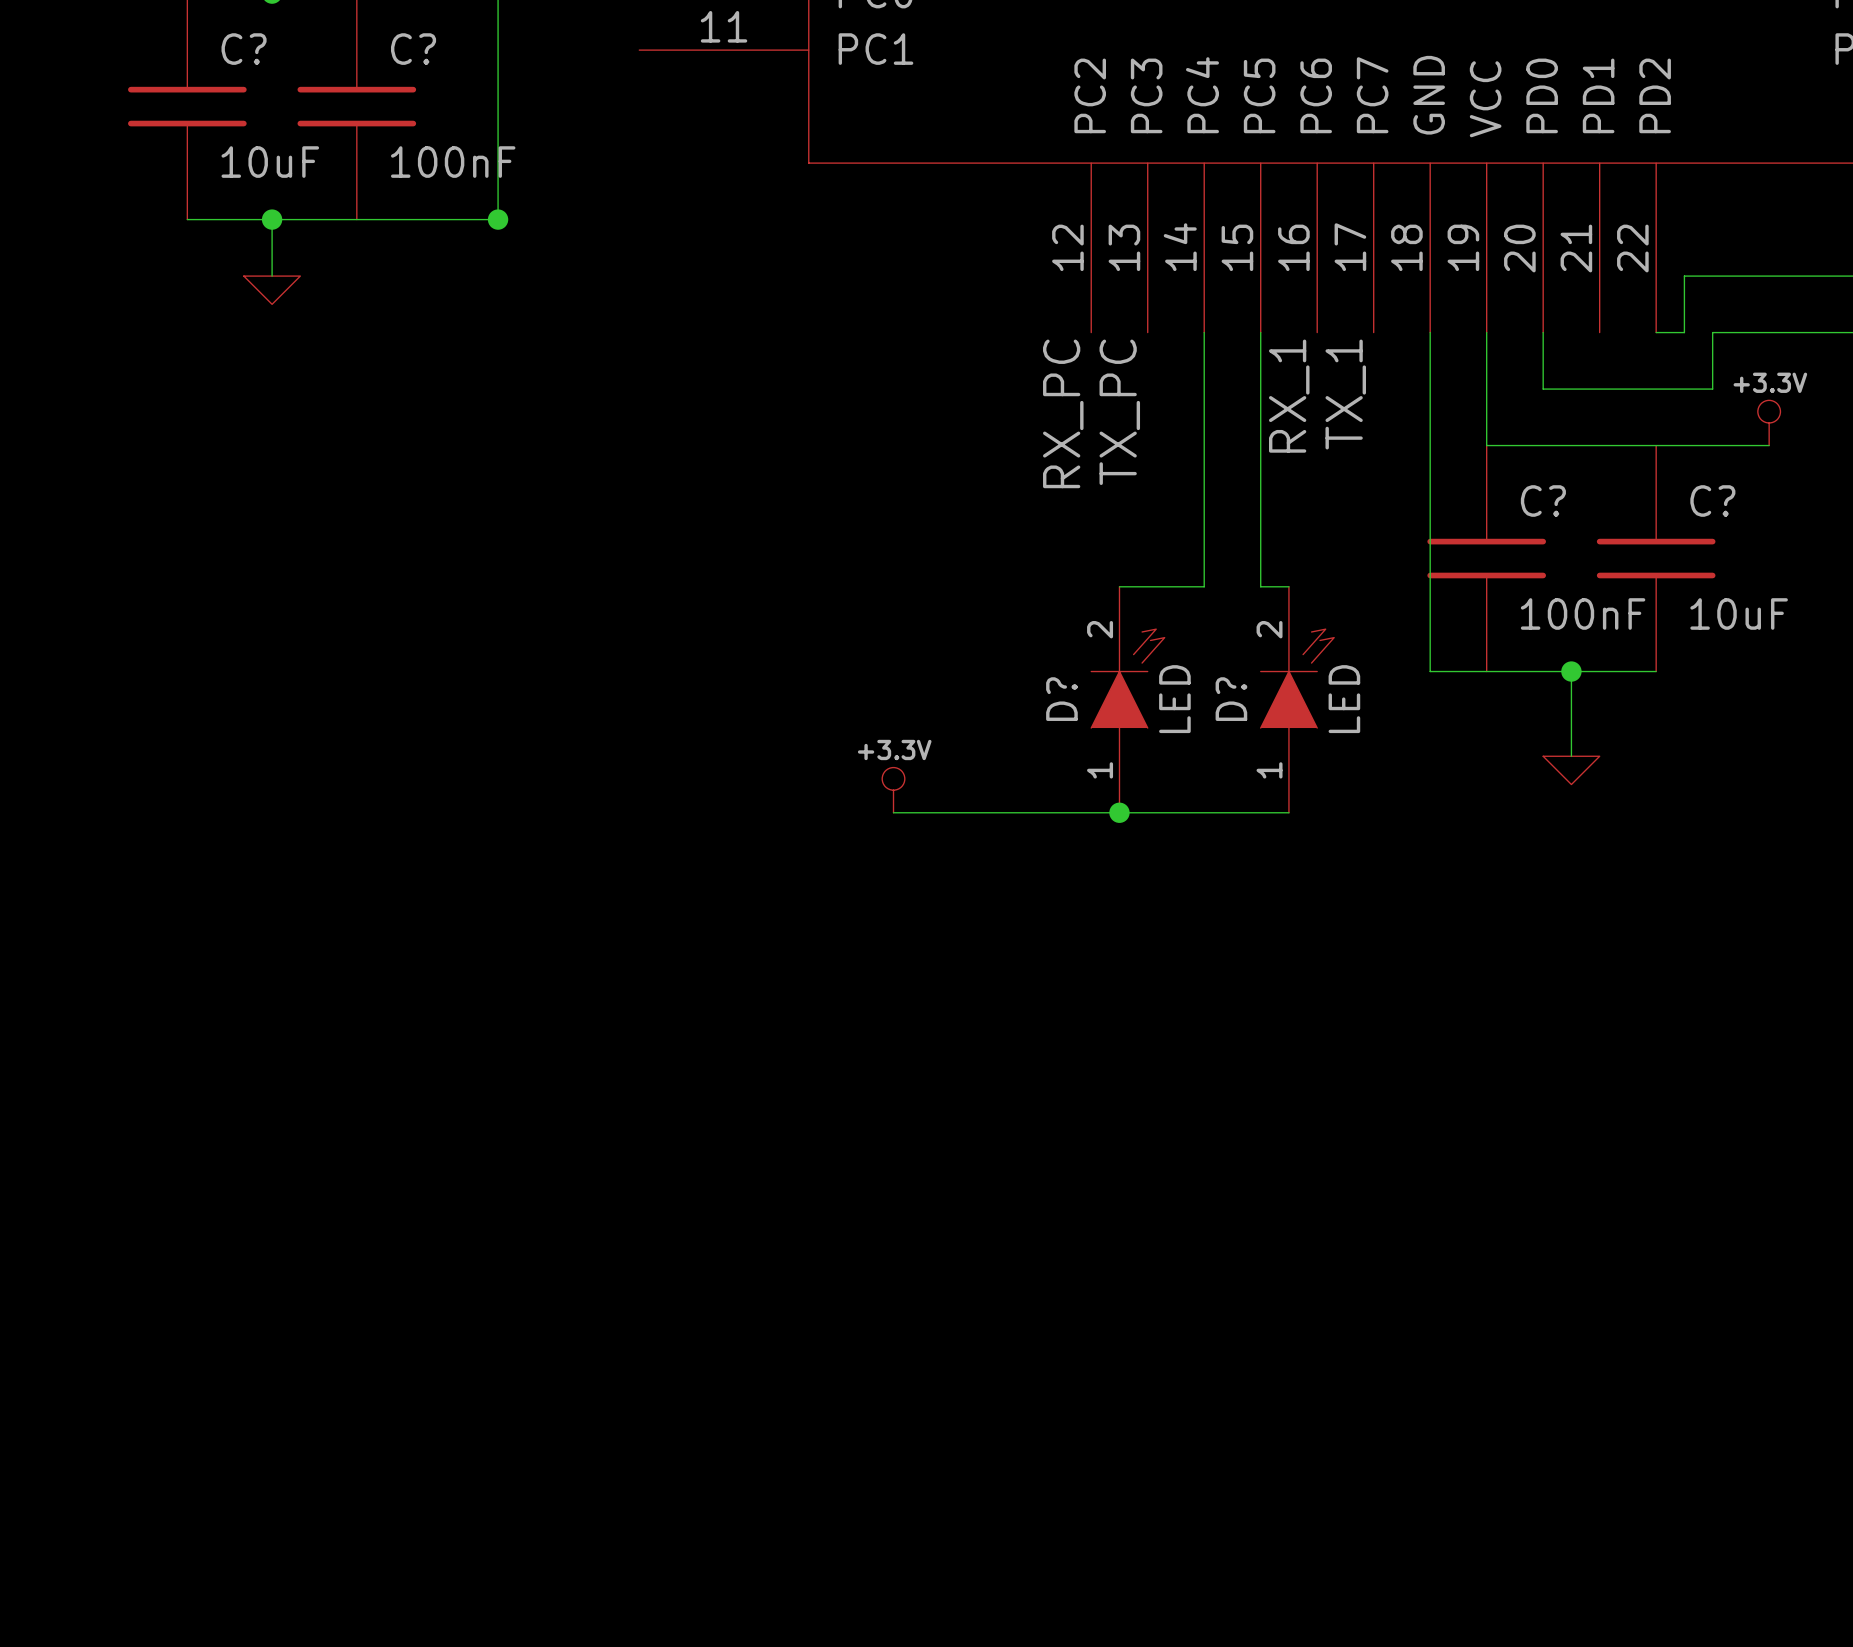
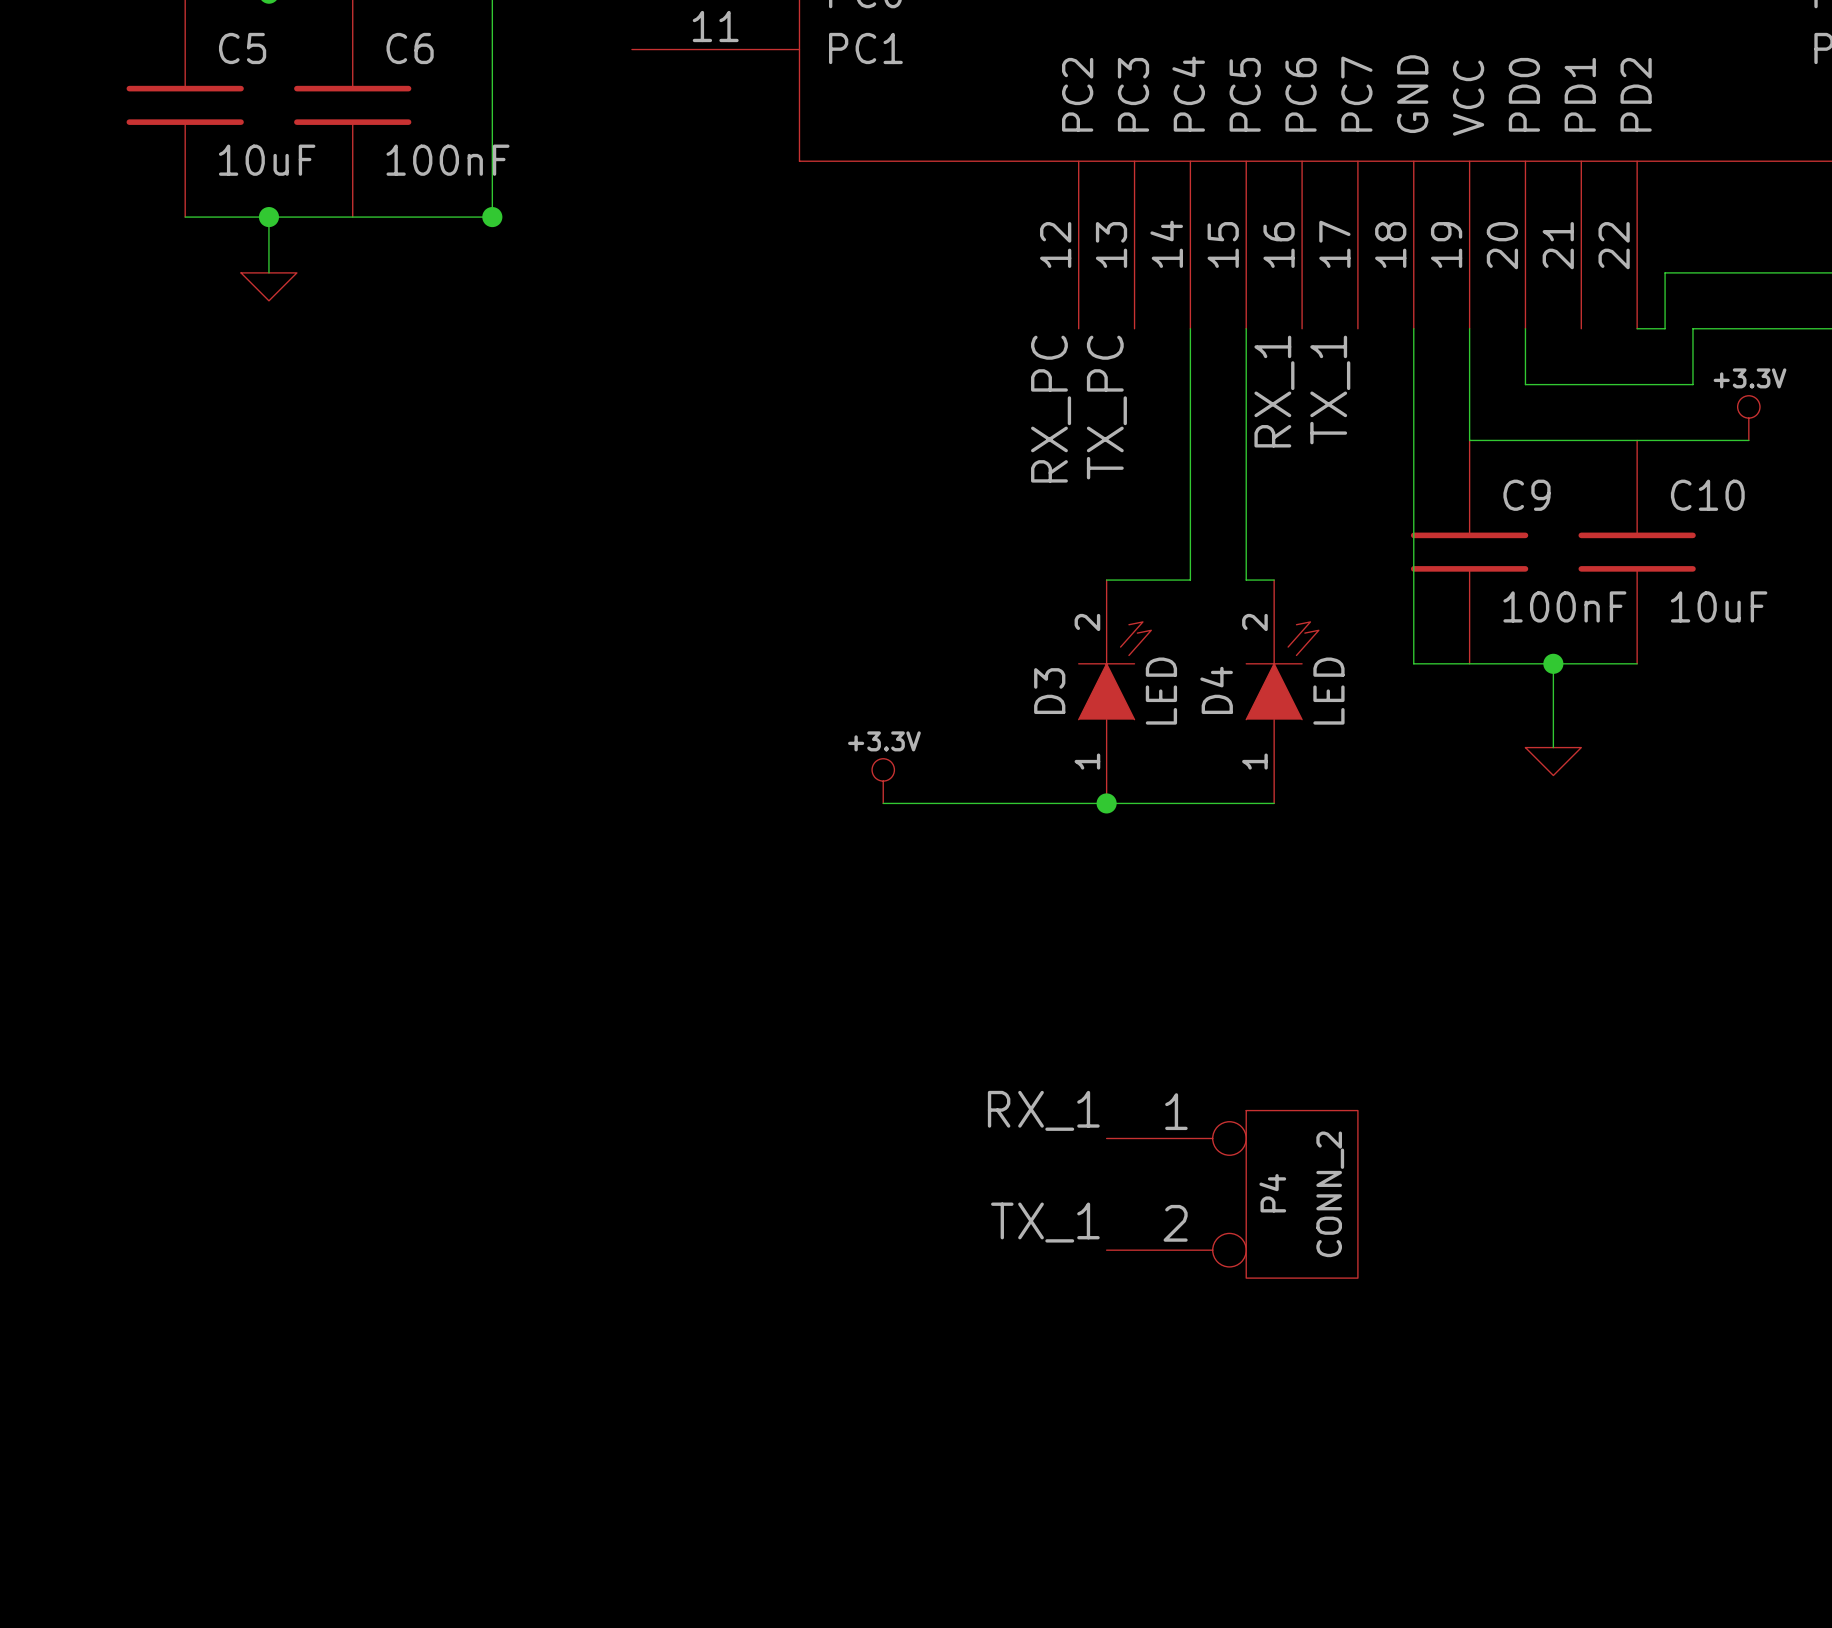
C? name: C? (244, 49) -> C5 (242, 48)
C? name: C? (413, 49) -> C6 (410, 48)
C? name: C? (1543, 501) -> C9 (1526, 495)
C? name: C? (1712, 501) -> C10 (1707, 495)
D? name: D? (1061, 699) -> D3 (1049, 691)
D? name: D? (1231, 699) -> D4 (1216, 690)
label: none -> RX_1 (1043, 1110)
P4: none -> CONN_2 (1232, 1194)
label: none -> TX_1 (1045, 1222)

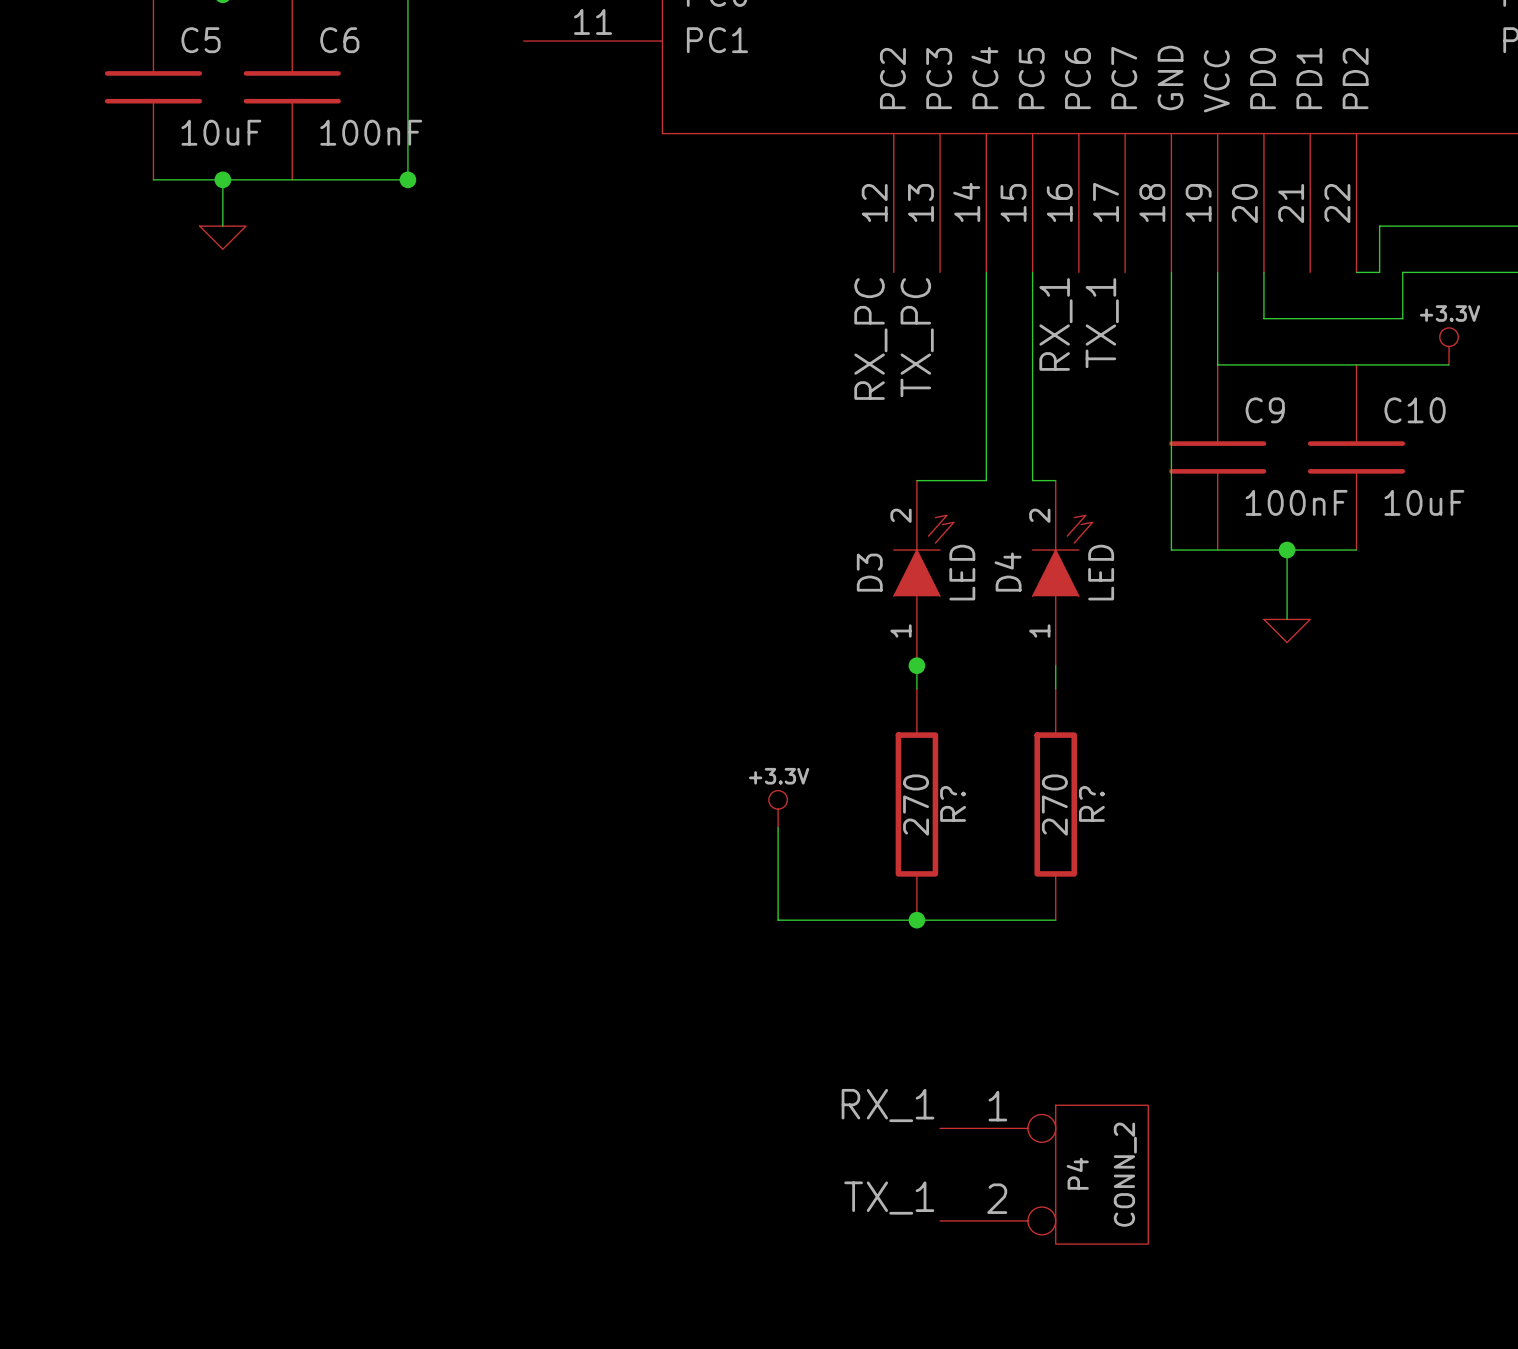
power symbol position: +3.3V (883, 781) -> +3.3V (778, 809)
wire: (883, 803) (1274, 803) -> (1055, 688) (1055, 665)
wire: none -> (916, 665) (916, 688)
R?: none -> 270 (916, 804)
R?: none -> 270 (1055, 804)
wire: none -> (778, 827) (778, 920) (1055, 920)
label position: RX_1 (1043, 1110) -> RX_1 (887, 1105)
junction: none -> (916, 920)
P4 position: (1232, 1194) -> (1044, 1174)
label position: TX_1 (1045, 1222) -> TX_1 (889, 1198)

